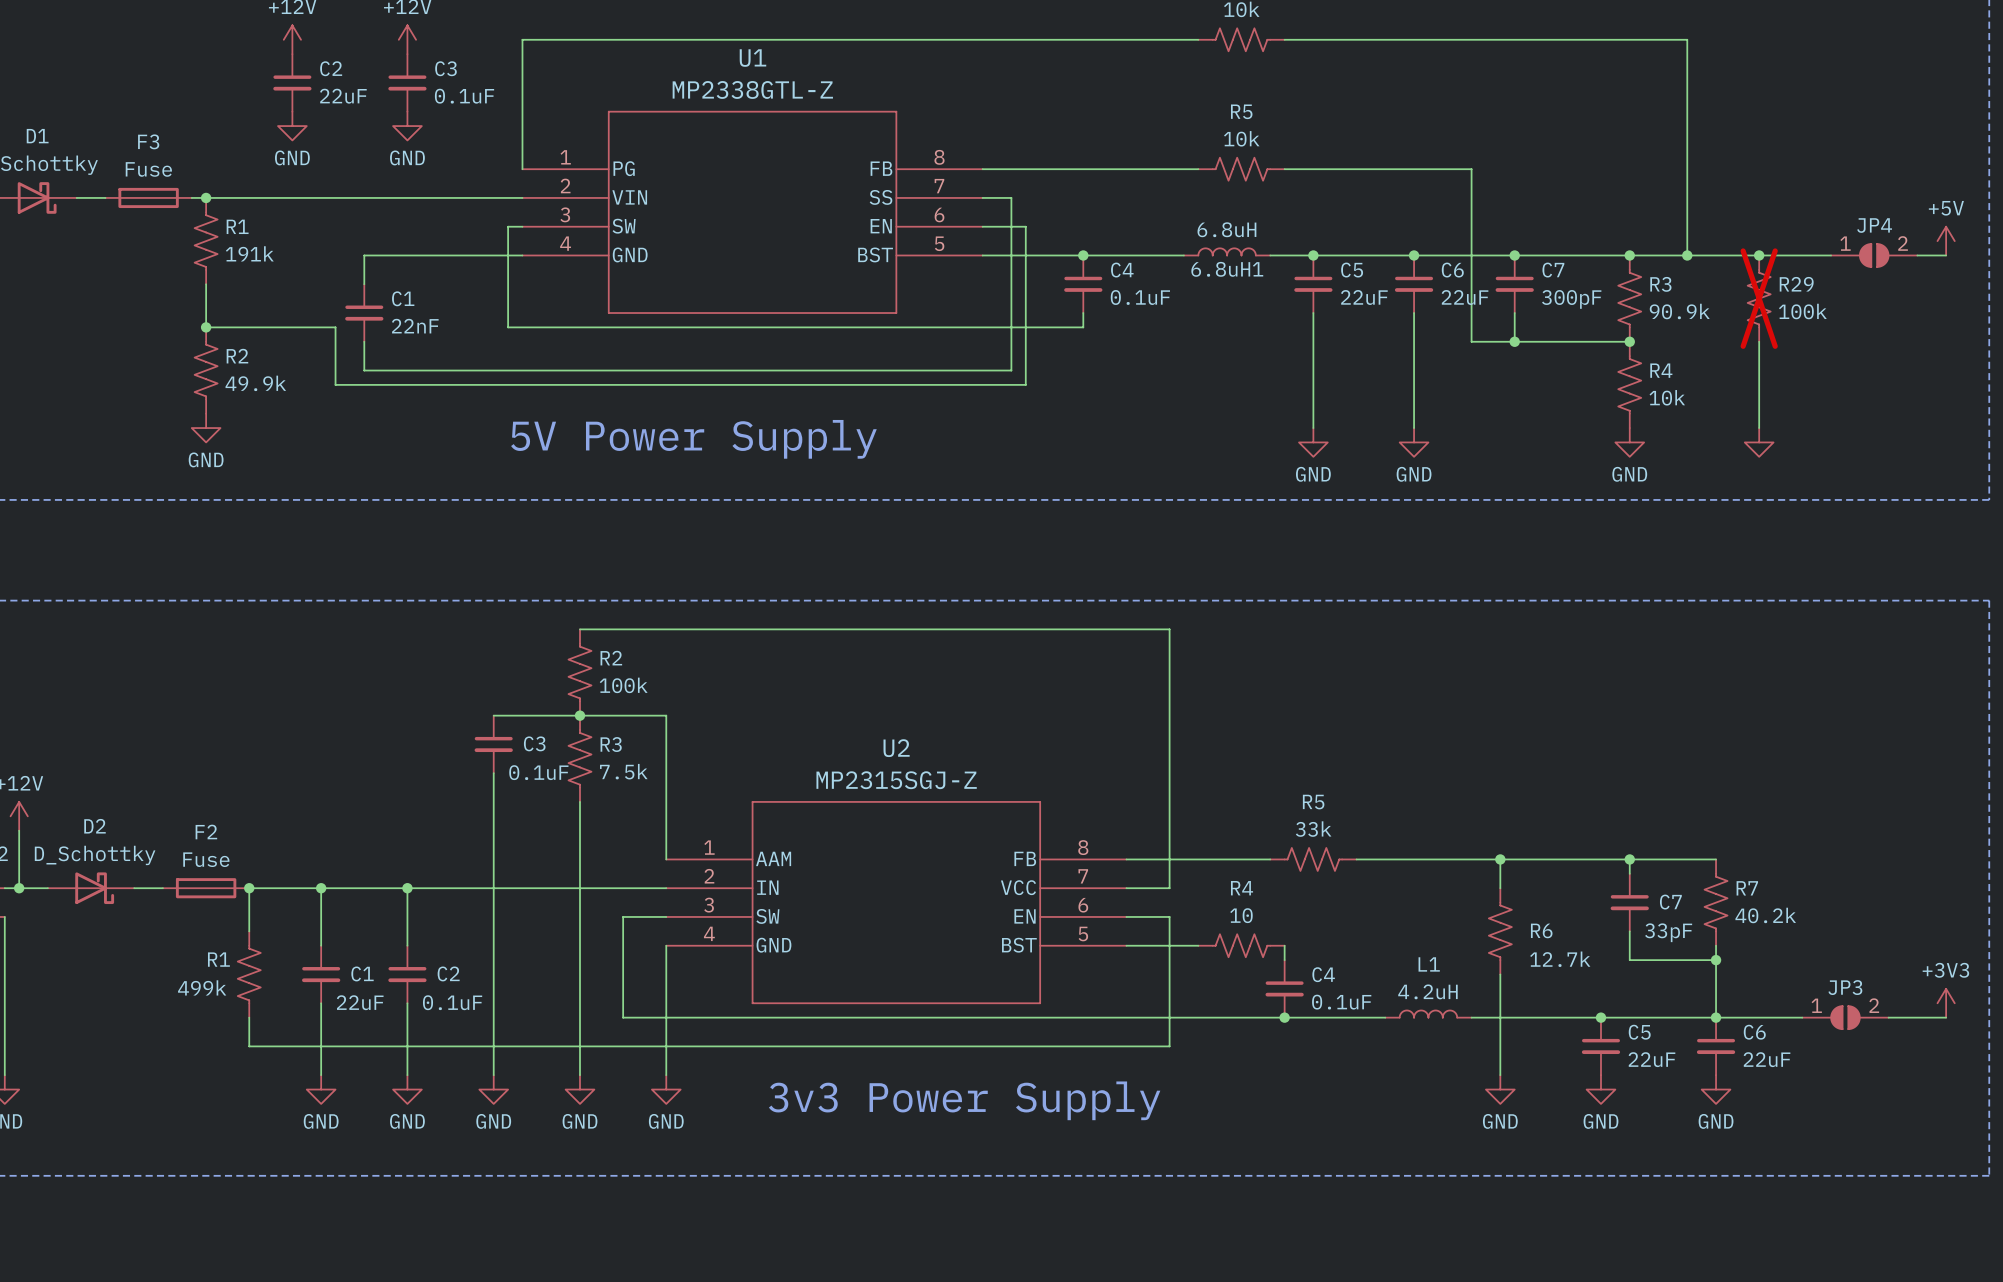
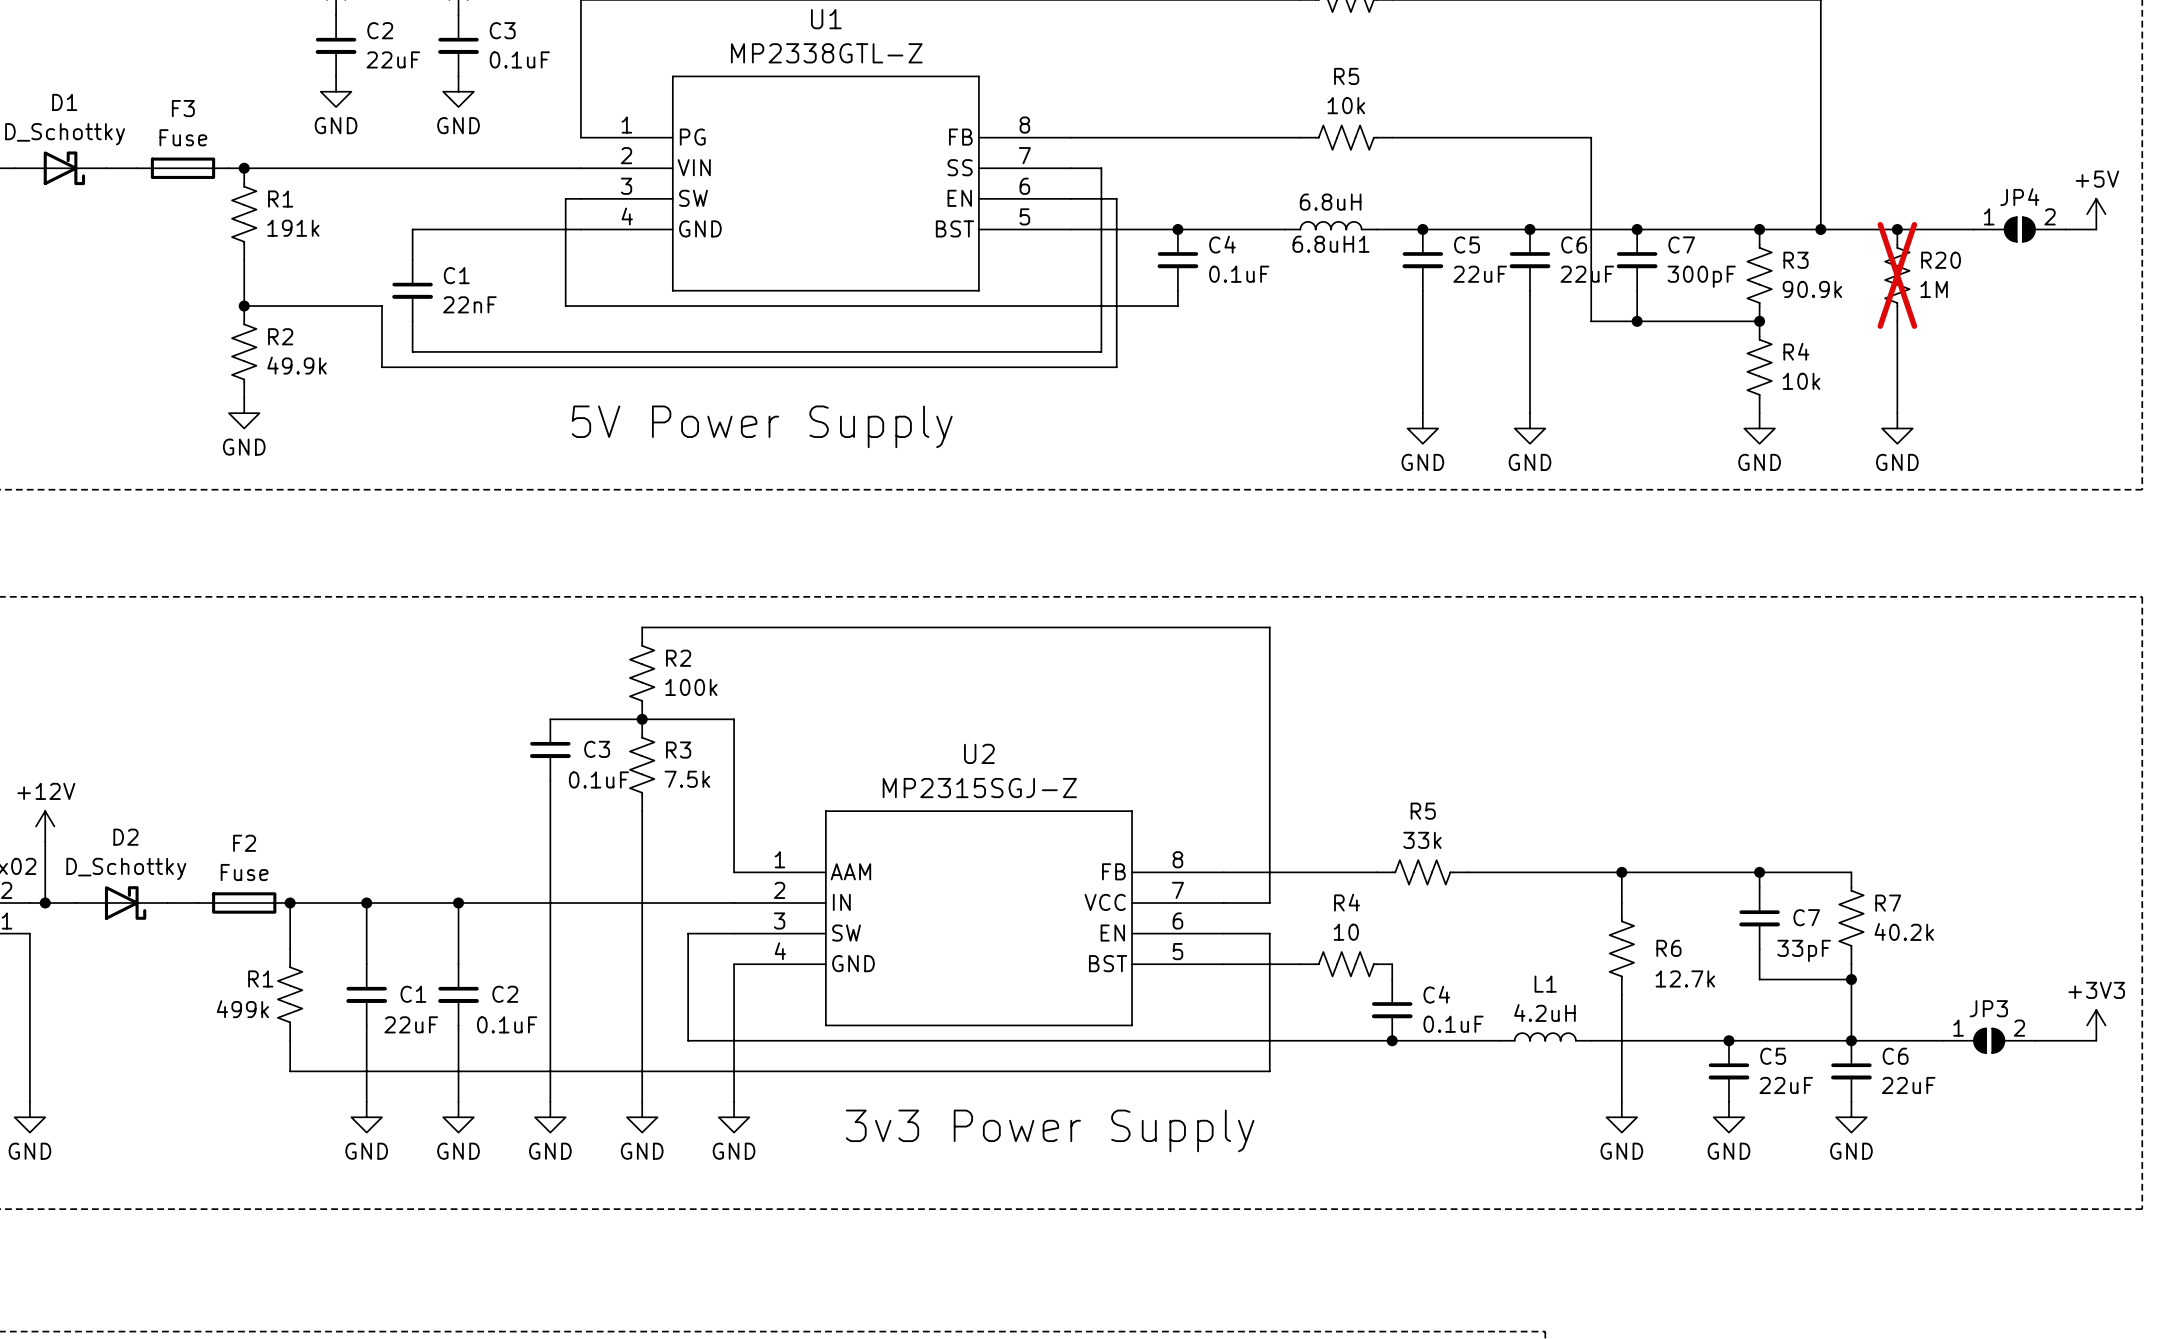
R29 name: R29 (1796, 284) -> R20 (1941, 260)
R29 value: 100k (1802, 311) -> 1M (1934, 289)
power symbol text: none -> GND (1897, 462)

